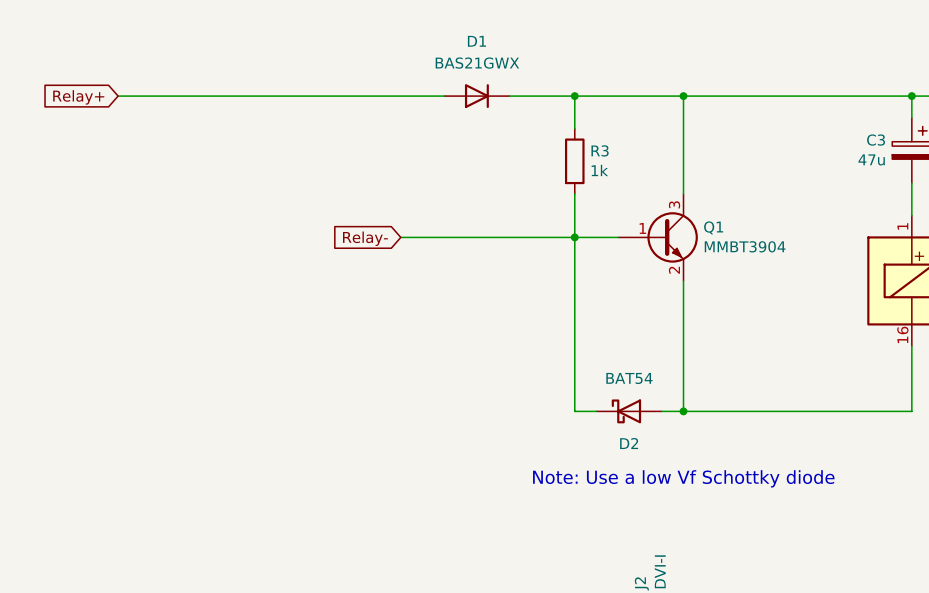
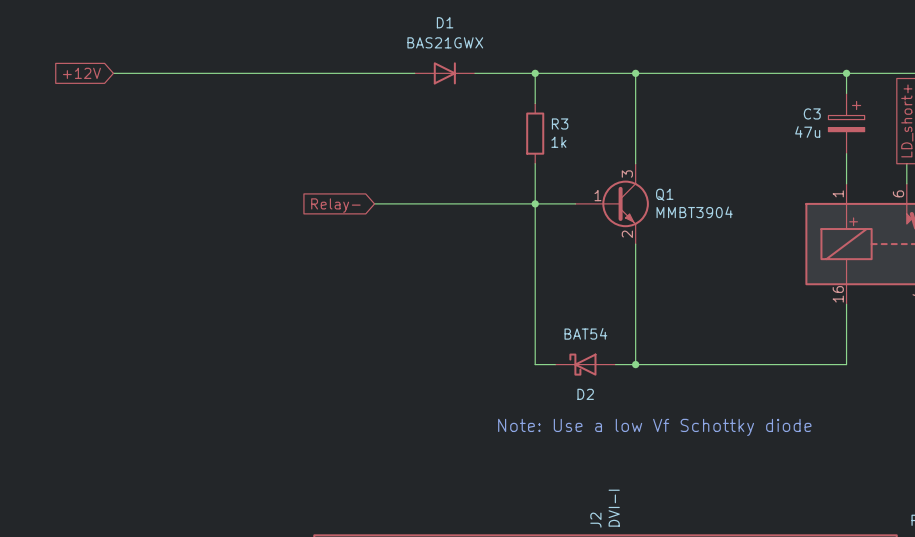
global label: Relay+ (78, 97) -> +12V (81, 73)

